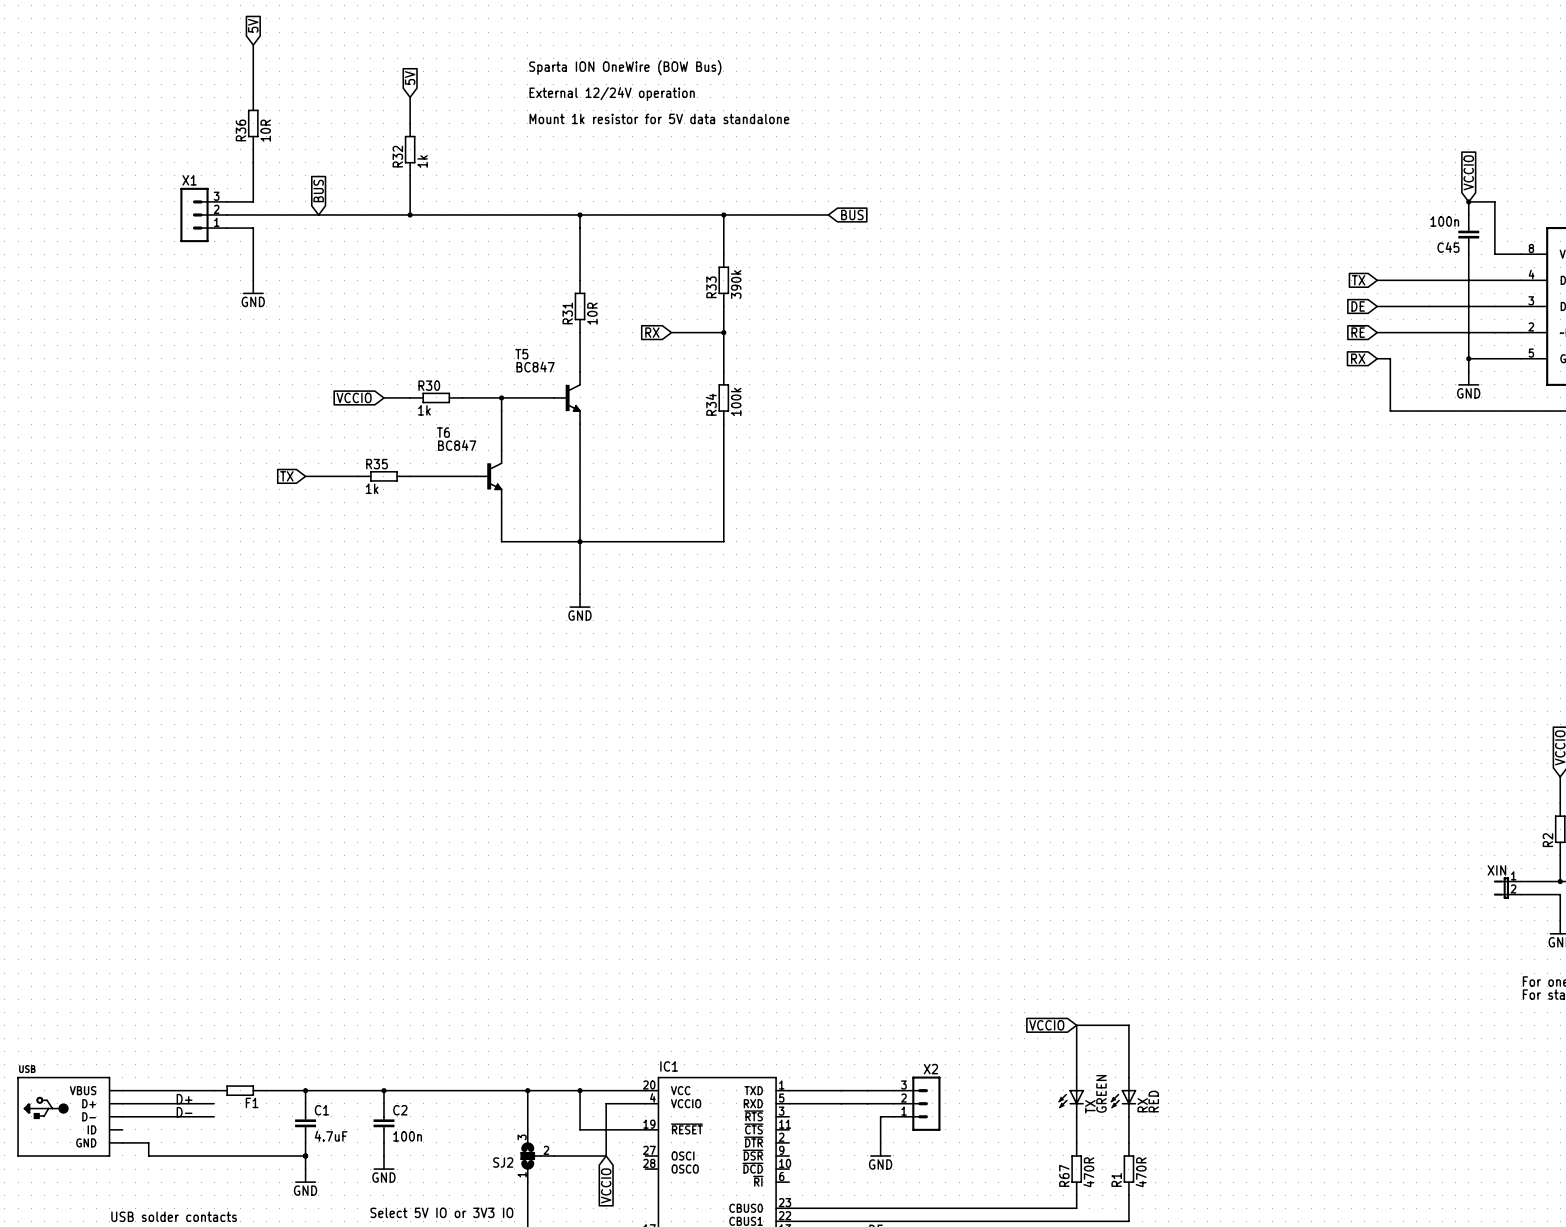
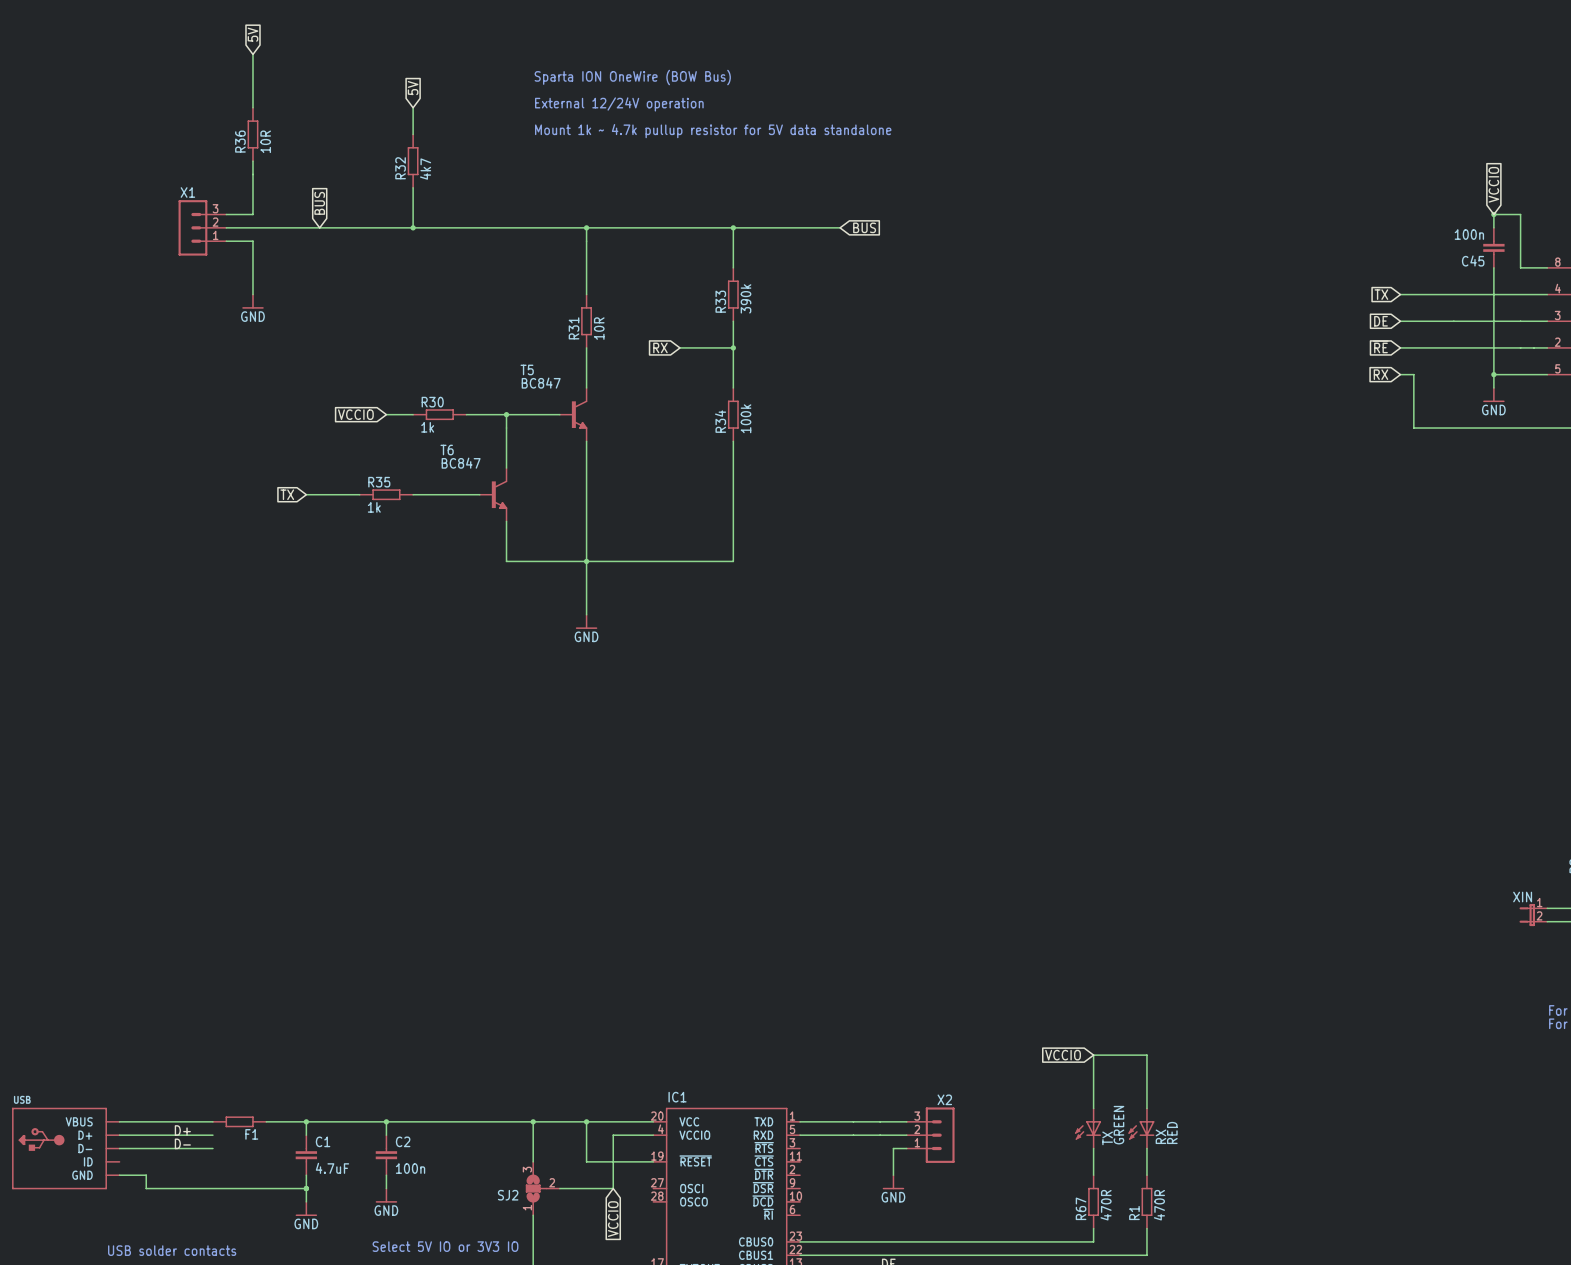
text: Mount 1k resistor for 5V data standalone (659, 118) -> Mount 1k ~ 4.7k pullup resistor for 5V data standalone (713, 131)
R32 value: 1k (422, 161) -> 4k7 (425, 169)

